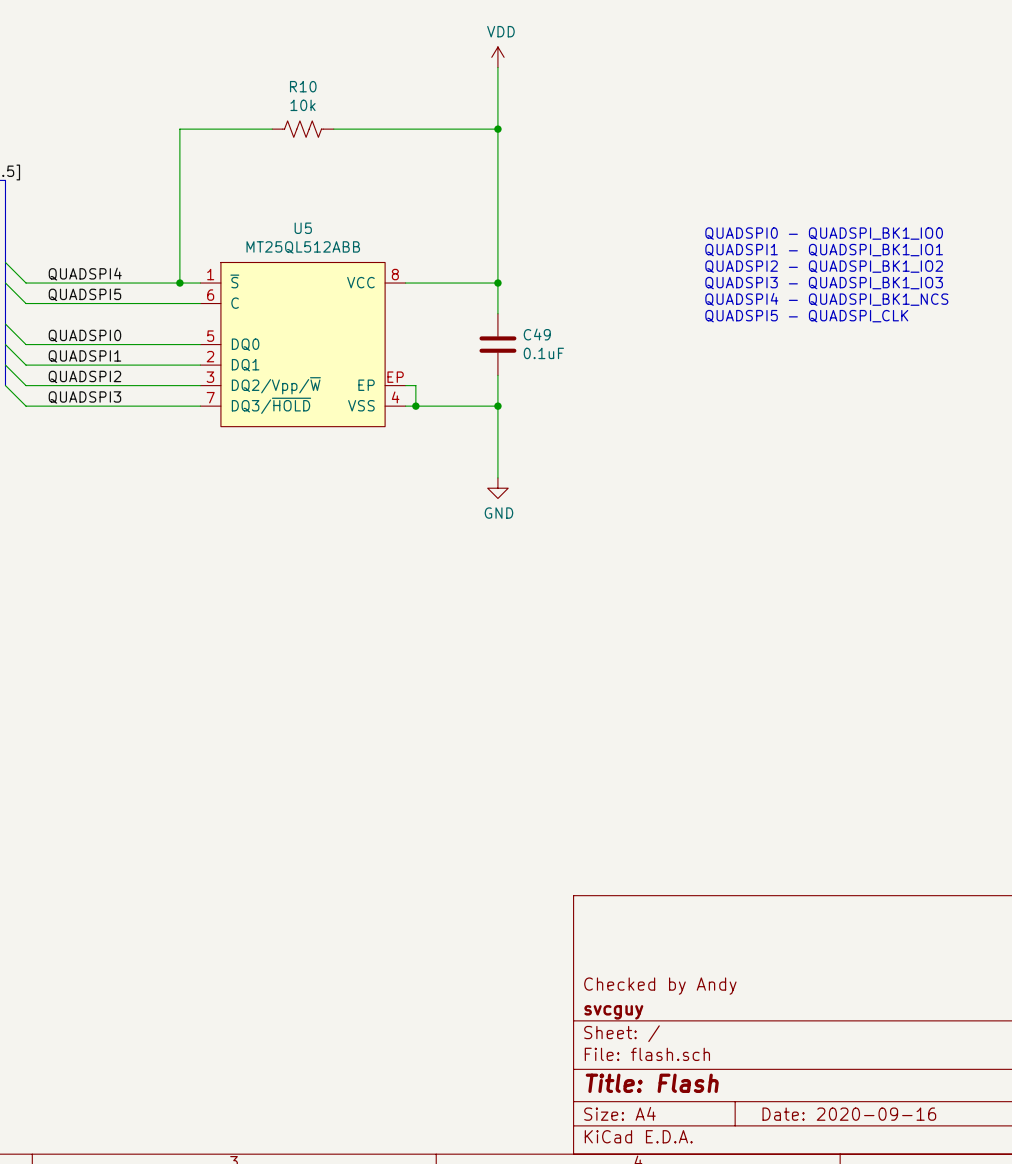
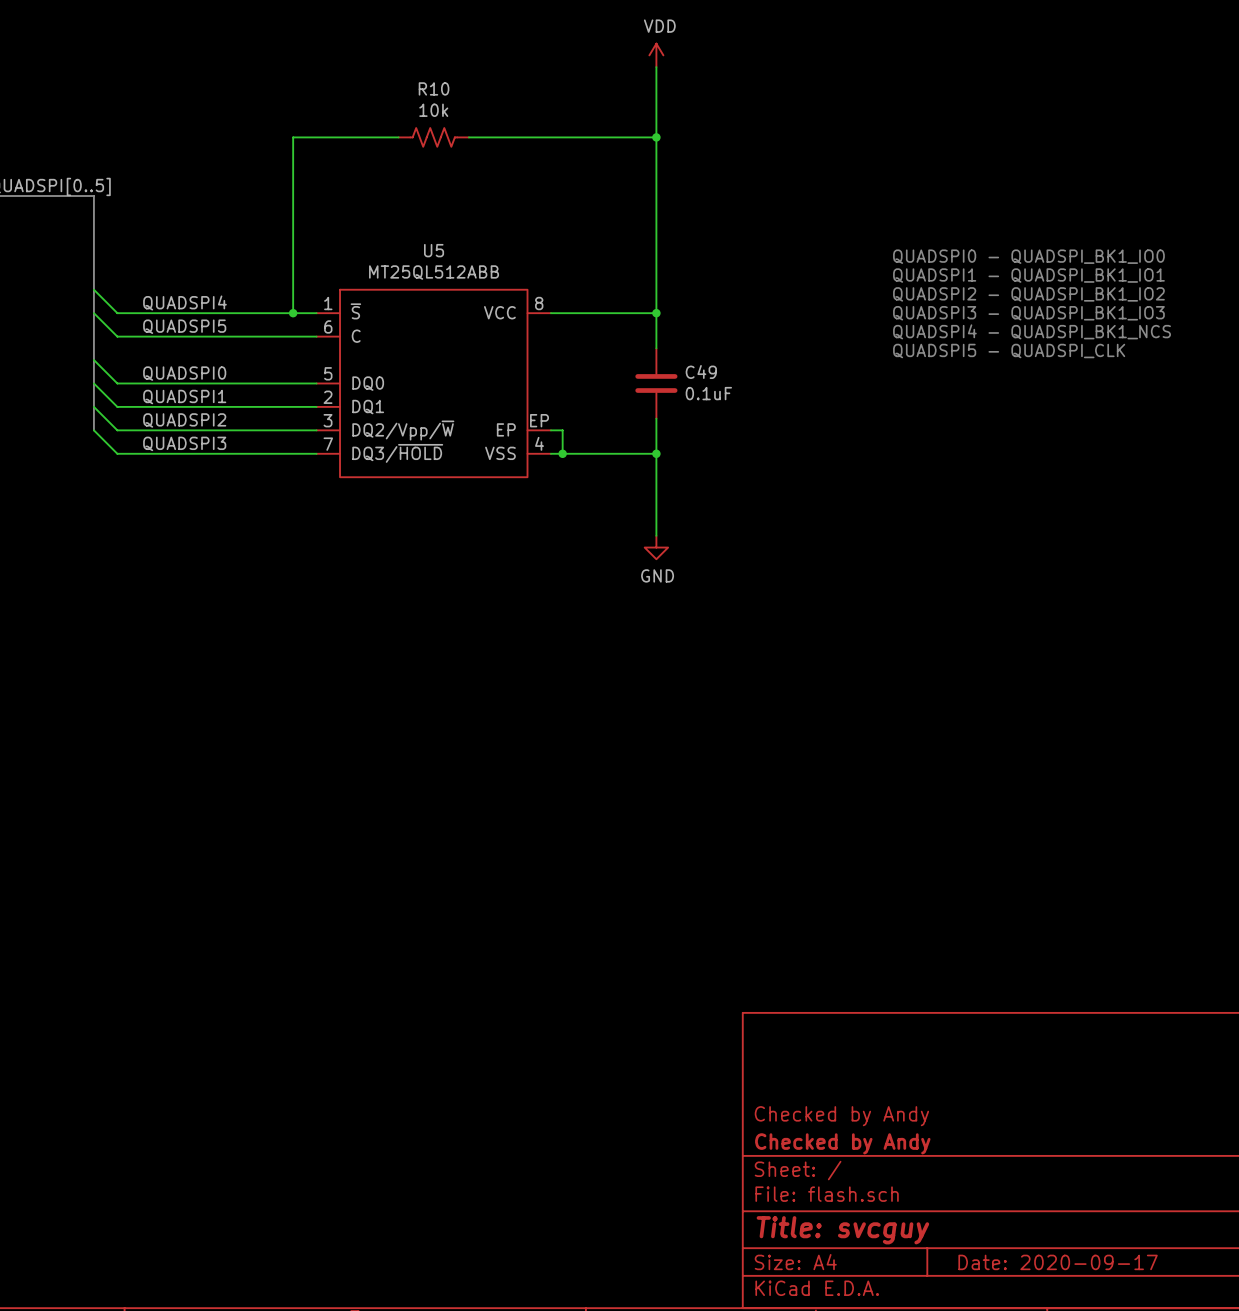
title block: svcguy (613, 1012) -> Checked by Andy (842, 1143)
title block: Title: Flash (652, 1083) -> Title: svcguy (842, 1230)
title block: Date: 2020-09-16 (849, 1114) -> Date: 2020-09-17 (1058, 1262)

